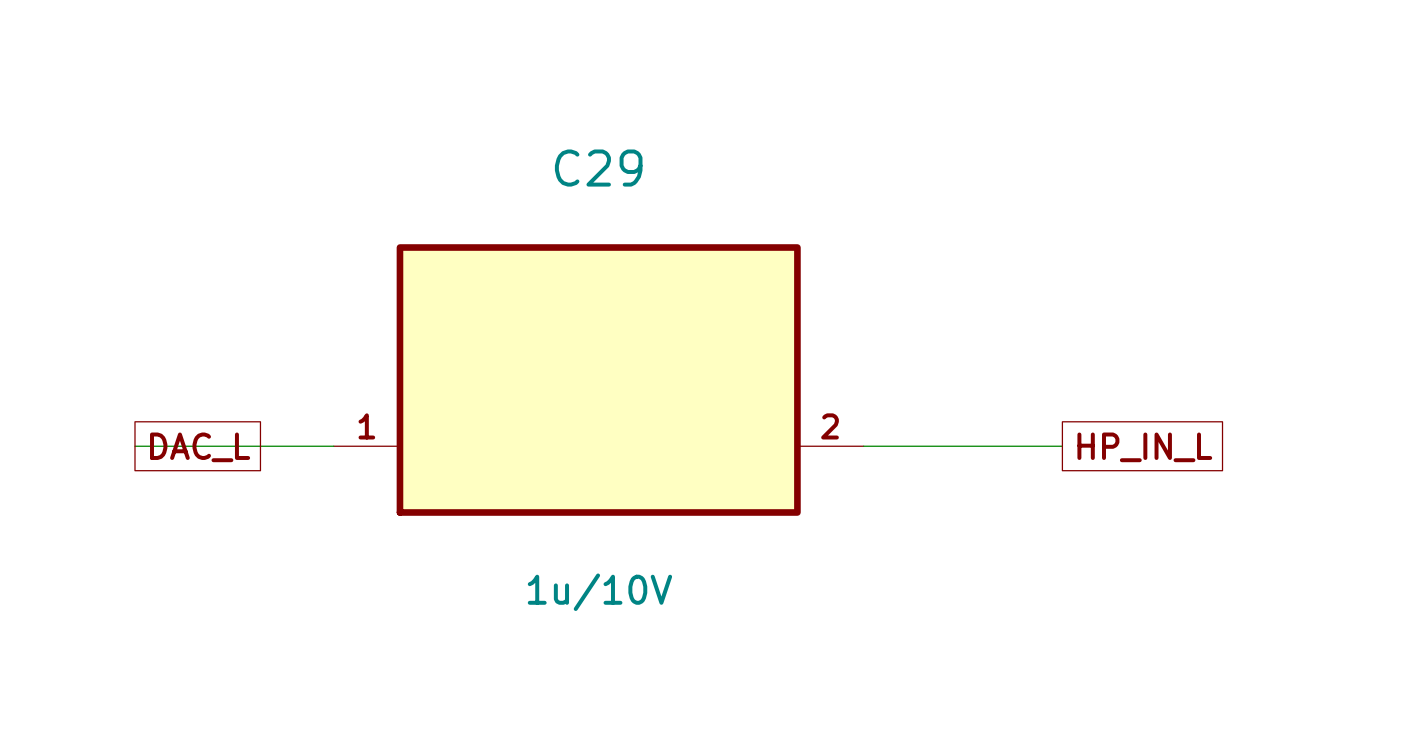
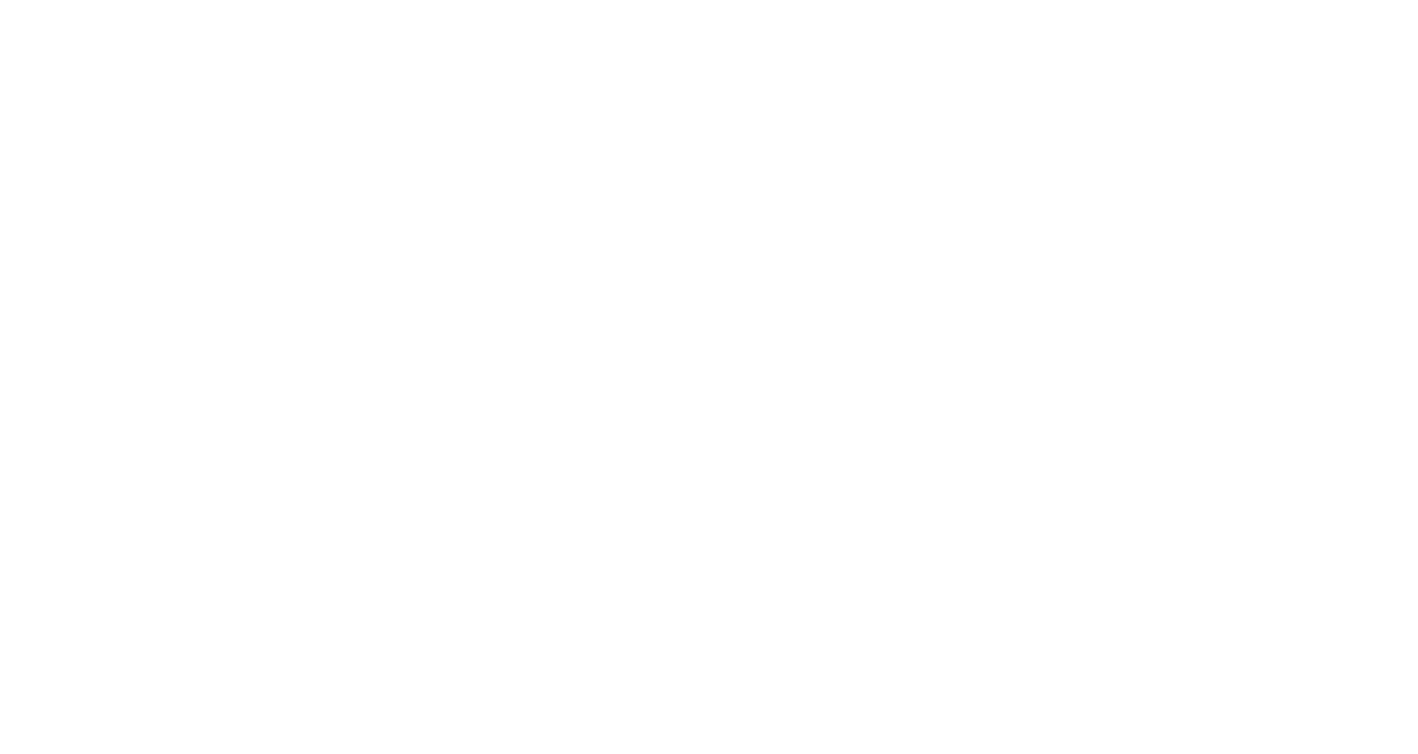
C29: 1u/10V (598, 380) -> none
wire: (134, 446) (333, 446) -> none
wire: (863, 446) (1062, 446) -> none
global label: DAC_L (200, 447) -> none
global label: HP_IN_L (1144, 447) -> none

